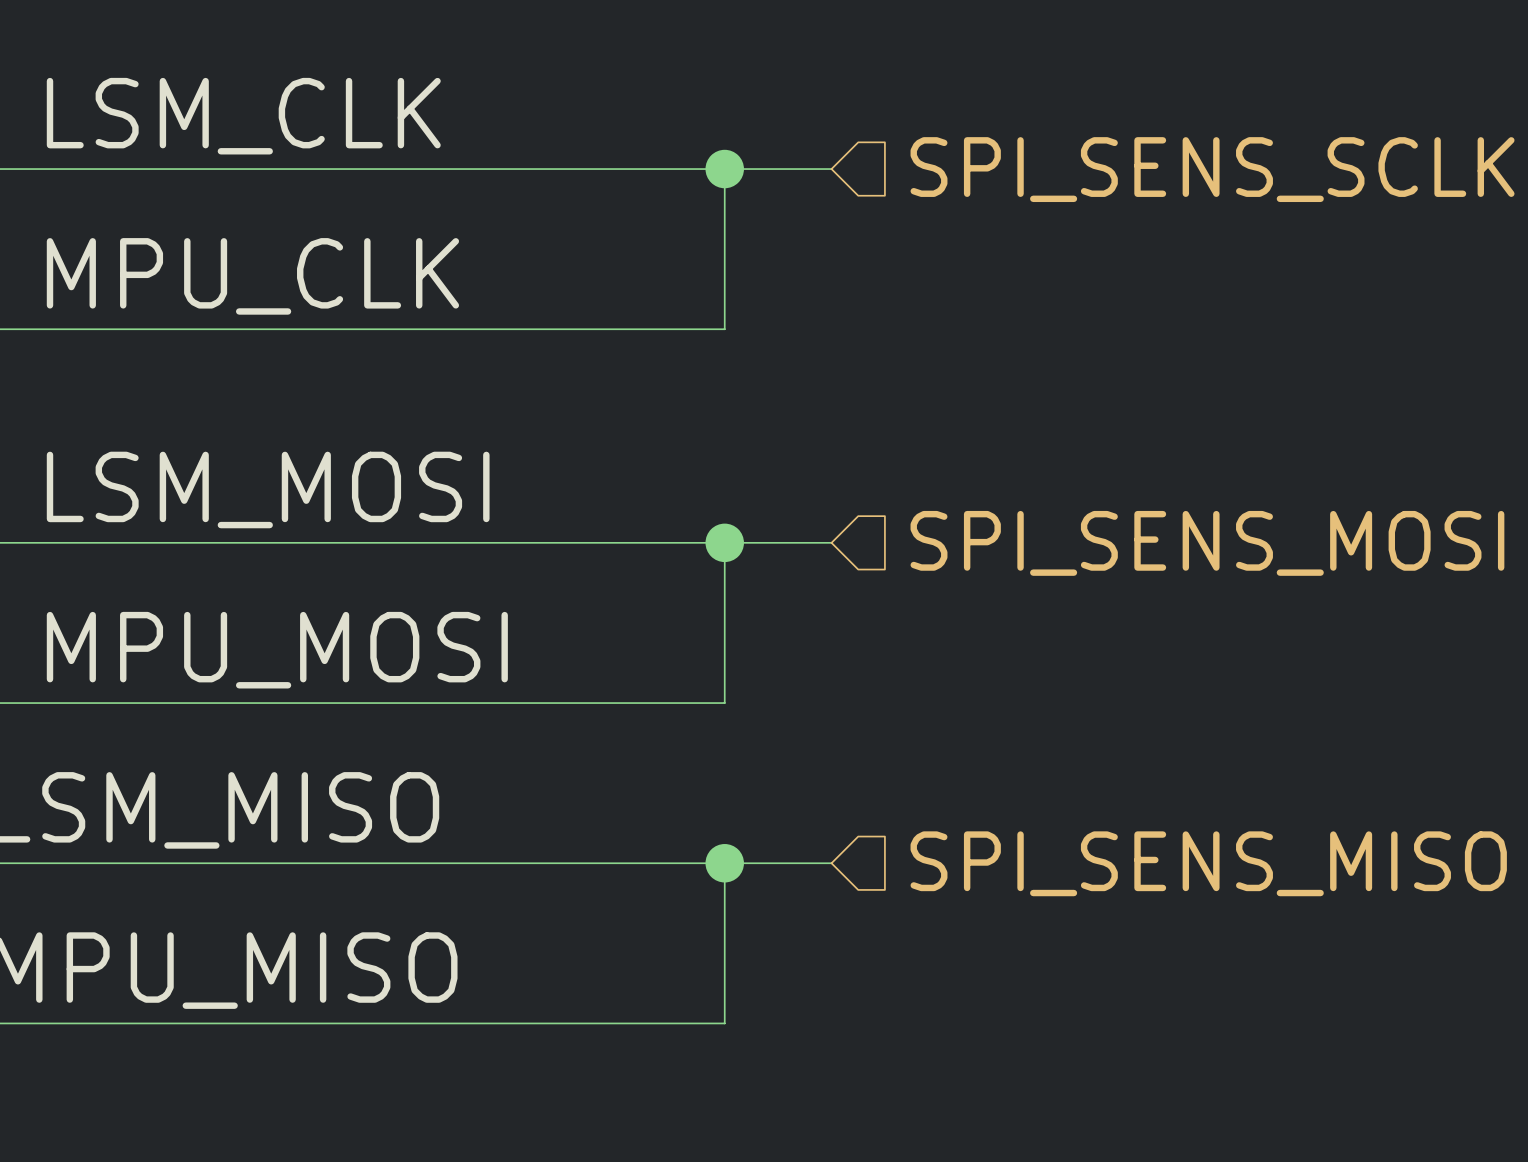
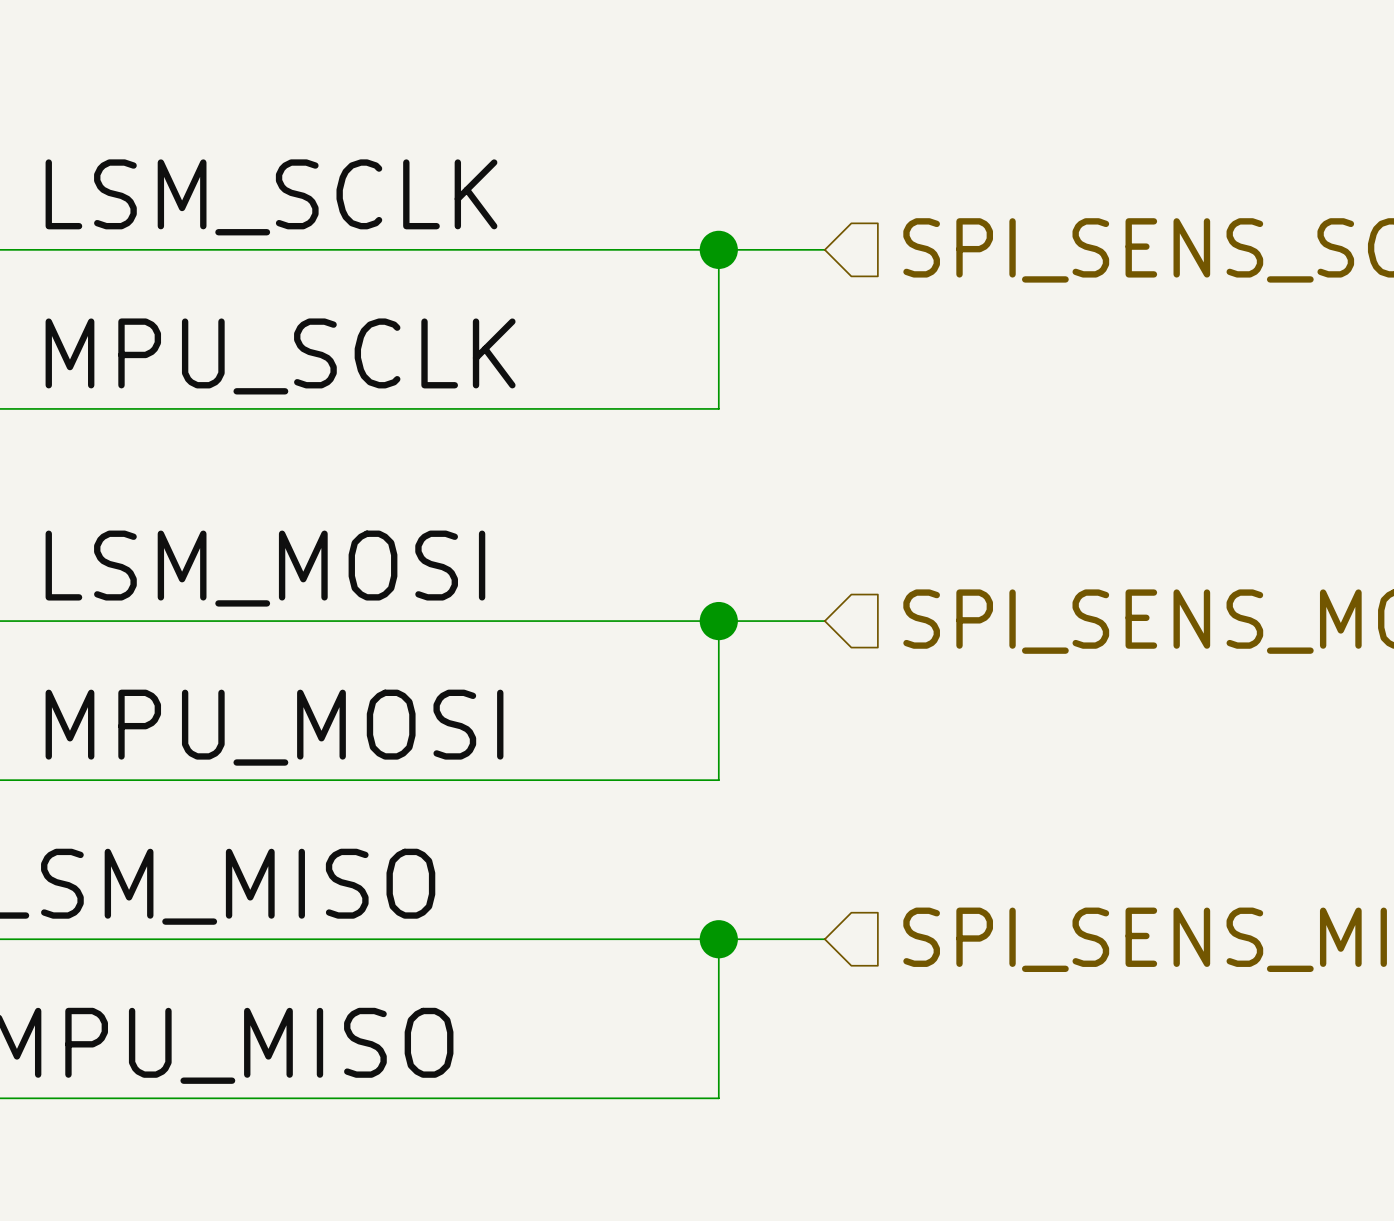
label: LSM_CLK (243, 116) -> LSM_SCLK (271, 197)
label: MPU_CLK (252, 276) -> MPU_SCLK (280, 356)

